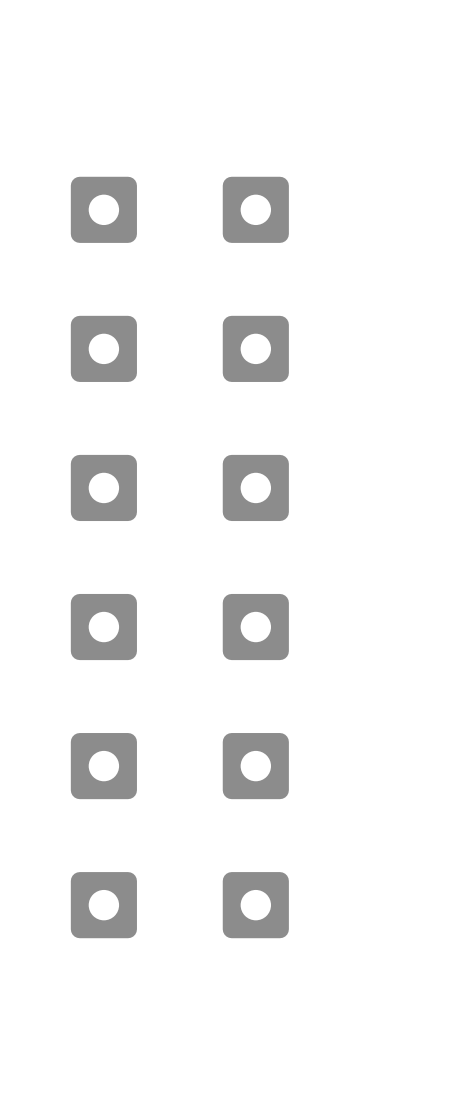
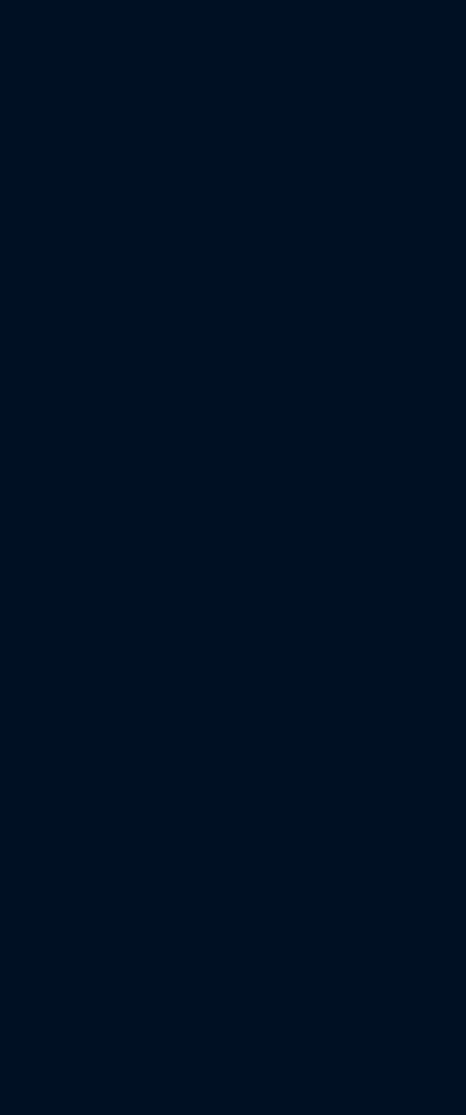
part: (103, 209) -> none
part: (255, 209) -> none
part: (103, 348) -> none
part: (255, 348) -> none
part: (103, 487) -> none
part: (255, 487) -> none
part: (103, 627) -> none
part: (255, 627) -> none
part: (103, 766) -> none
part: (255, 766) -> none
part: (103, 905) -> none
part: (255, 905) -> none

